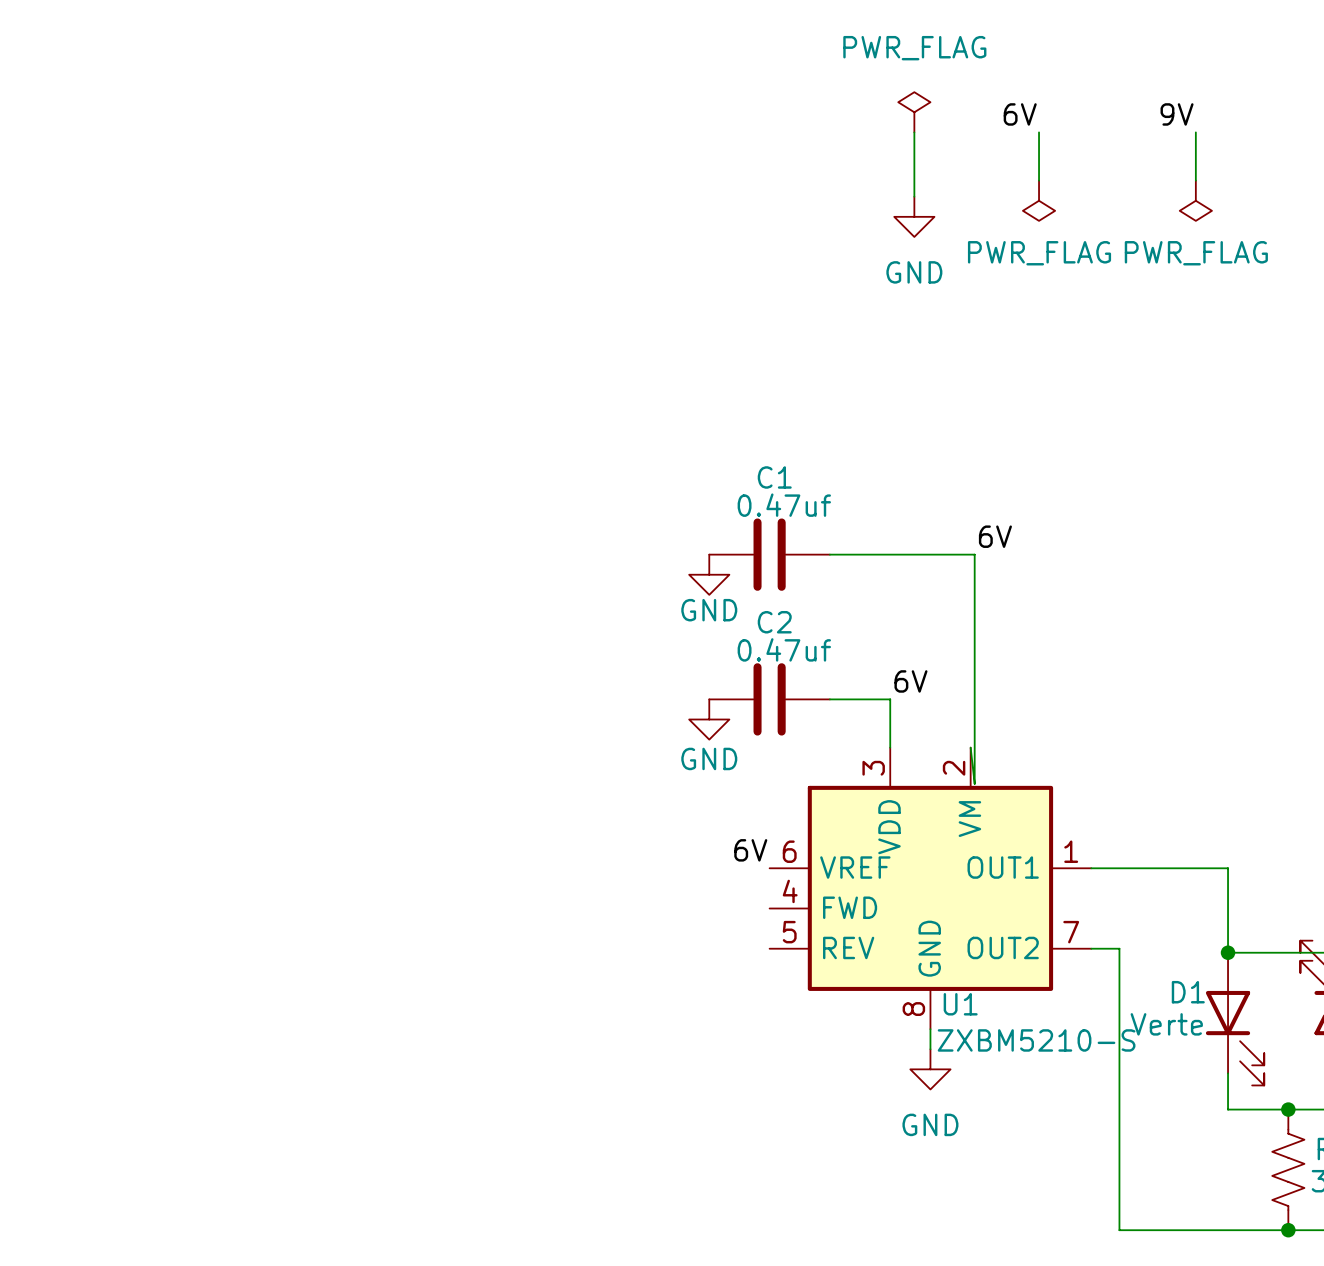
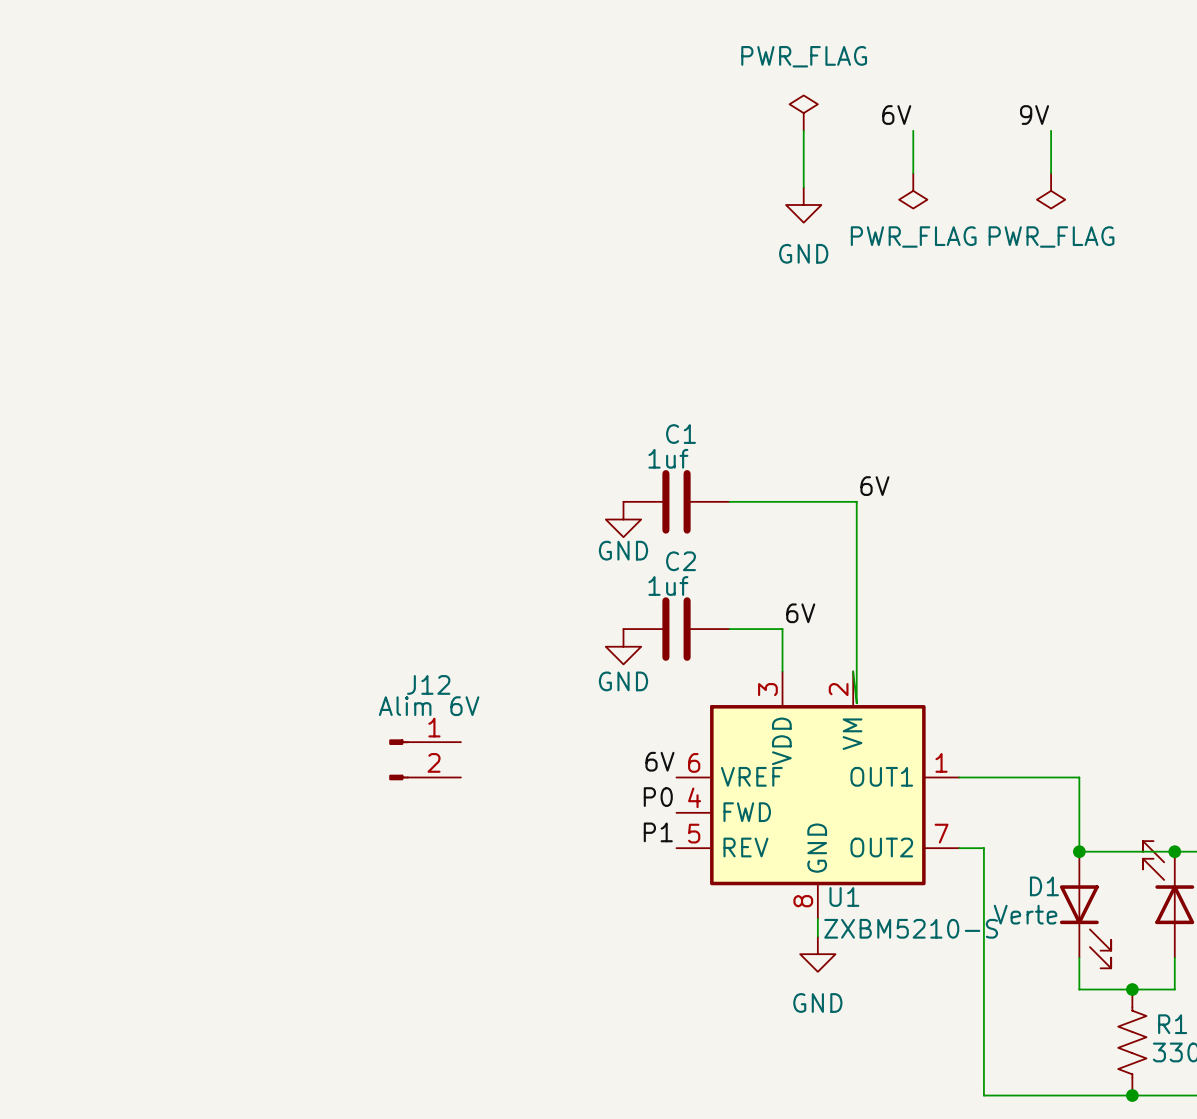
C1 value: 0.47uf (784, 505) -> 1uf (668, 458)
C2 value: 0.47uf (784, 649) -> 1uf (668, 586)
J12: none -> Alim 6V (425, 759)
label: none -> P0 (658, 797)
label: none -> P1 (658, 832)

